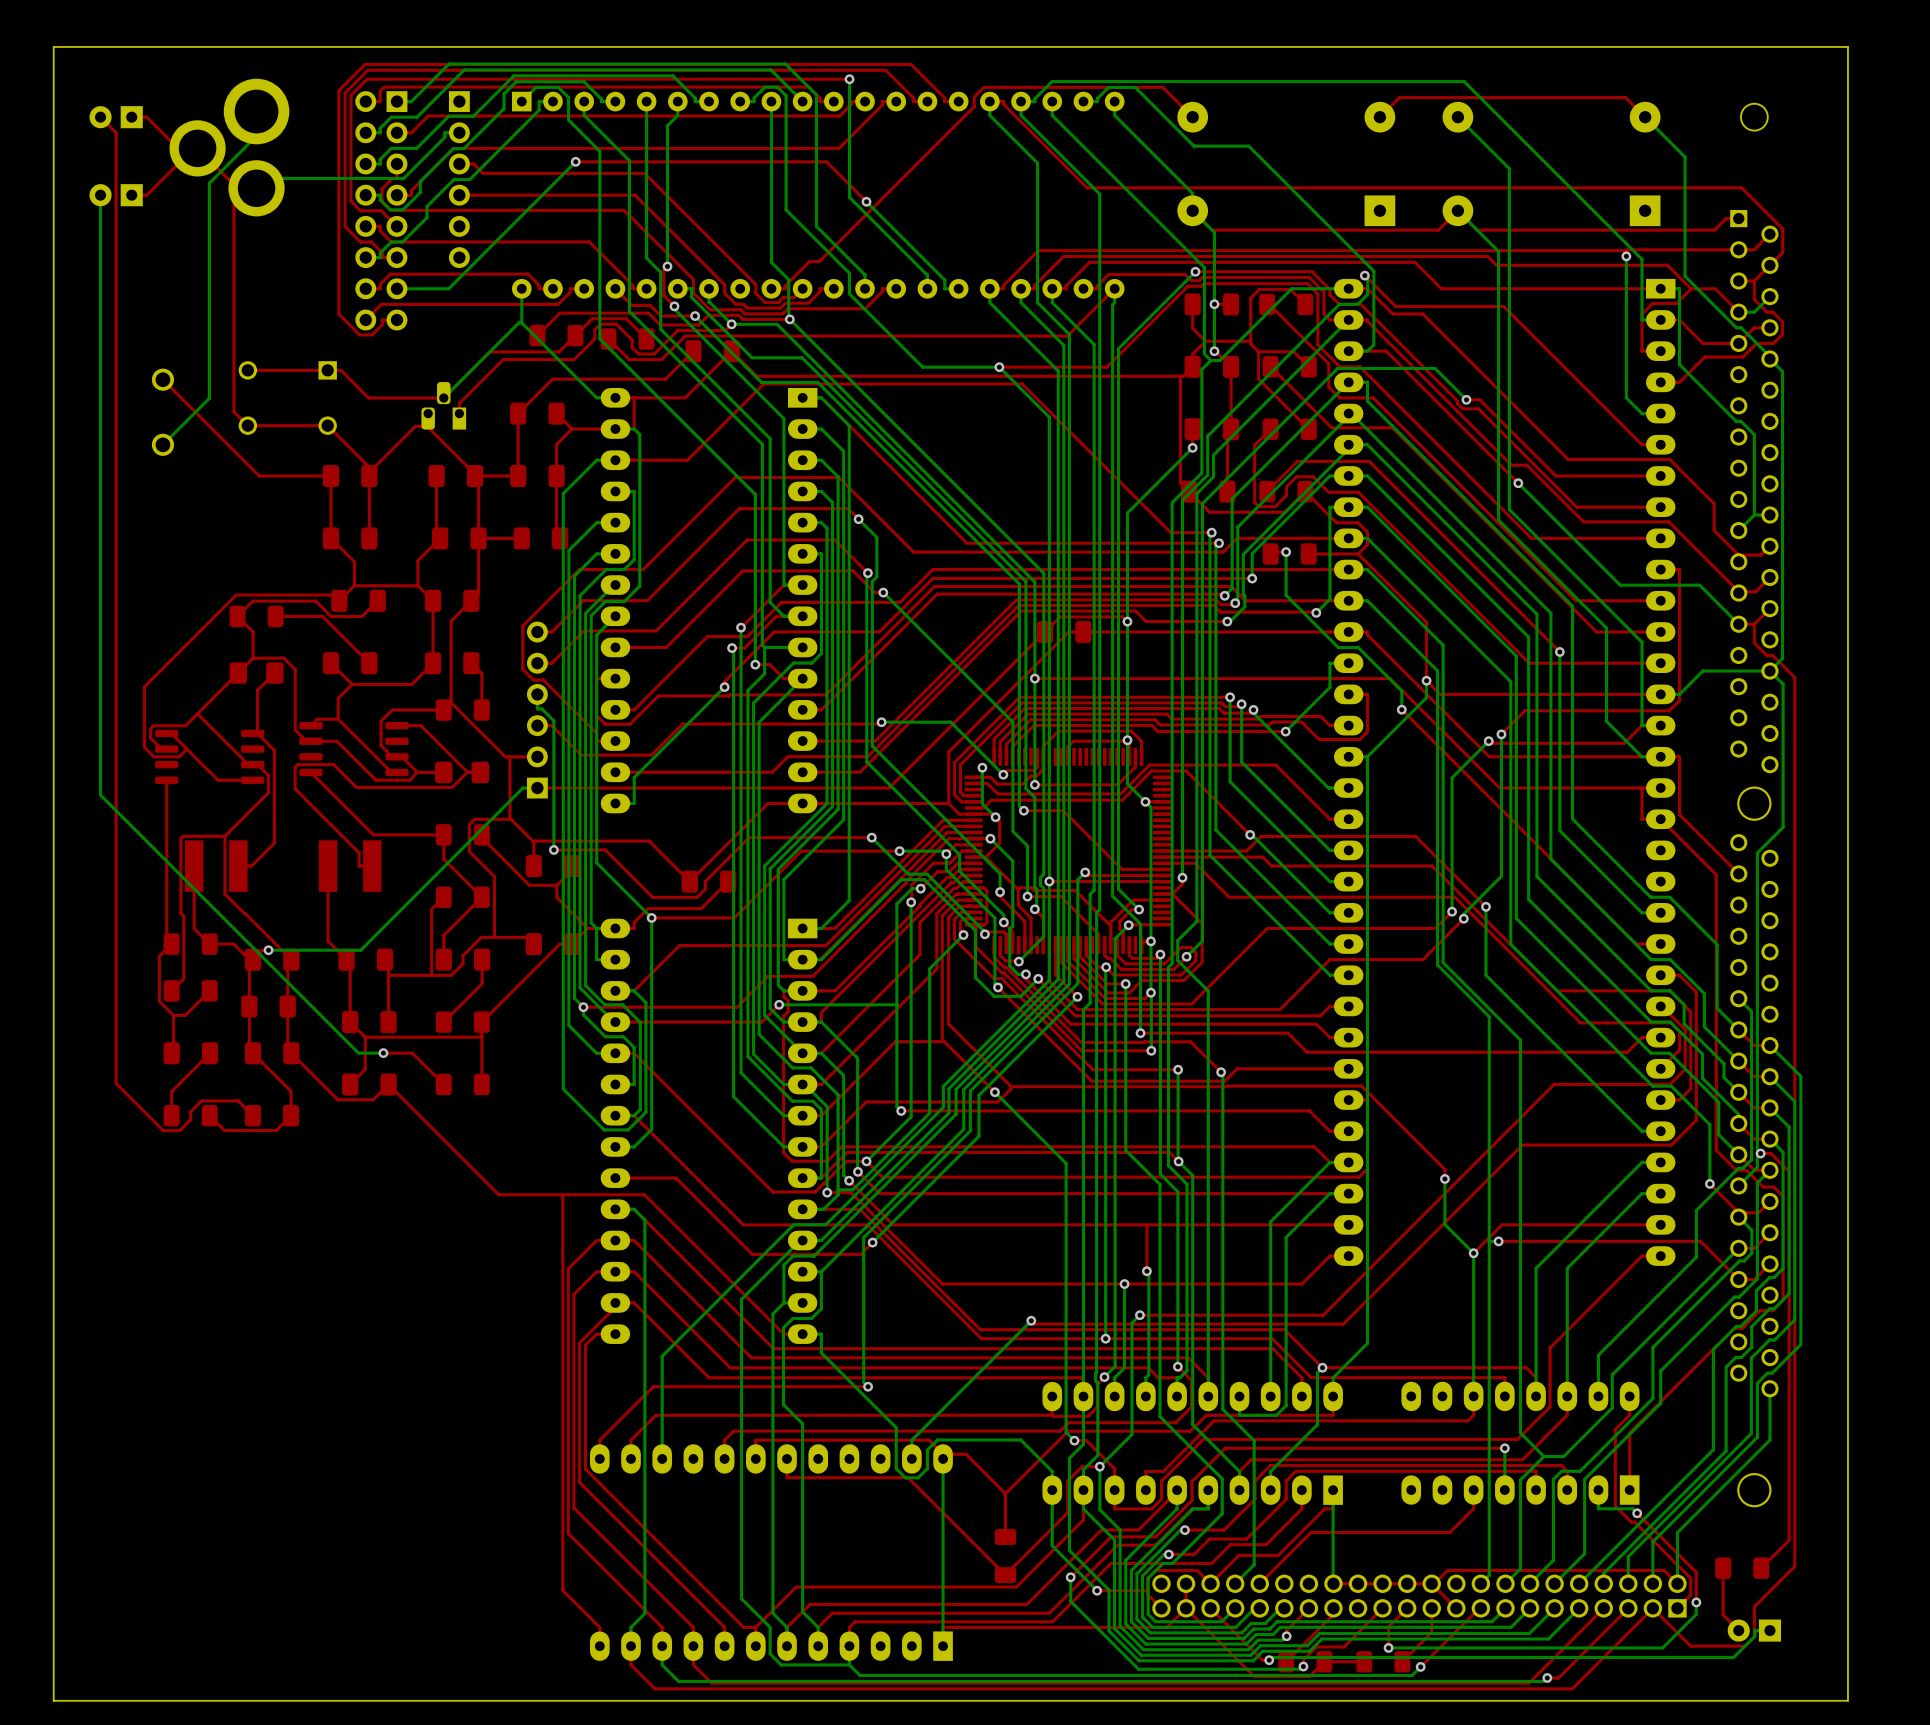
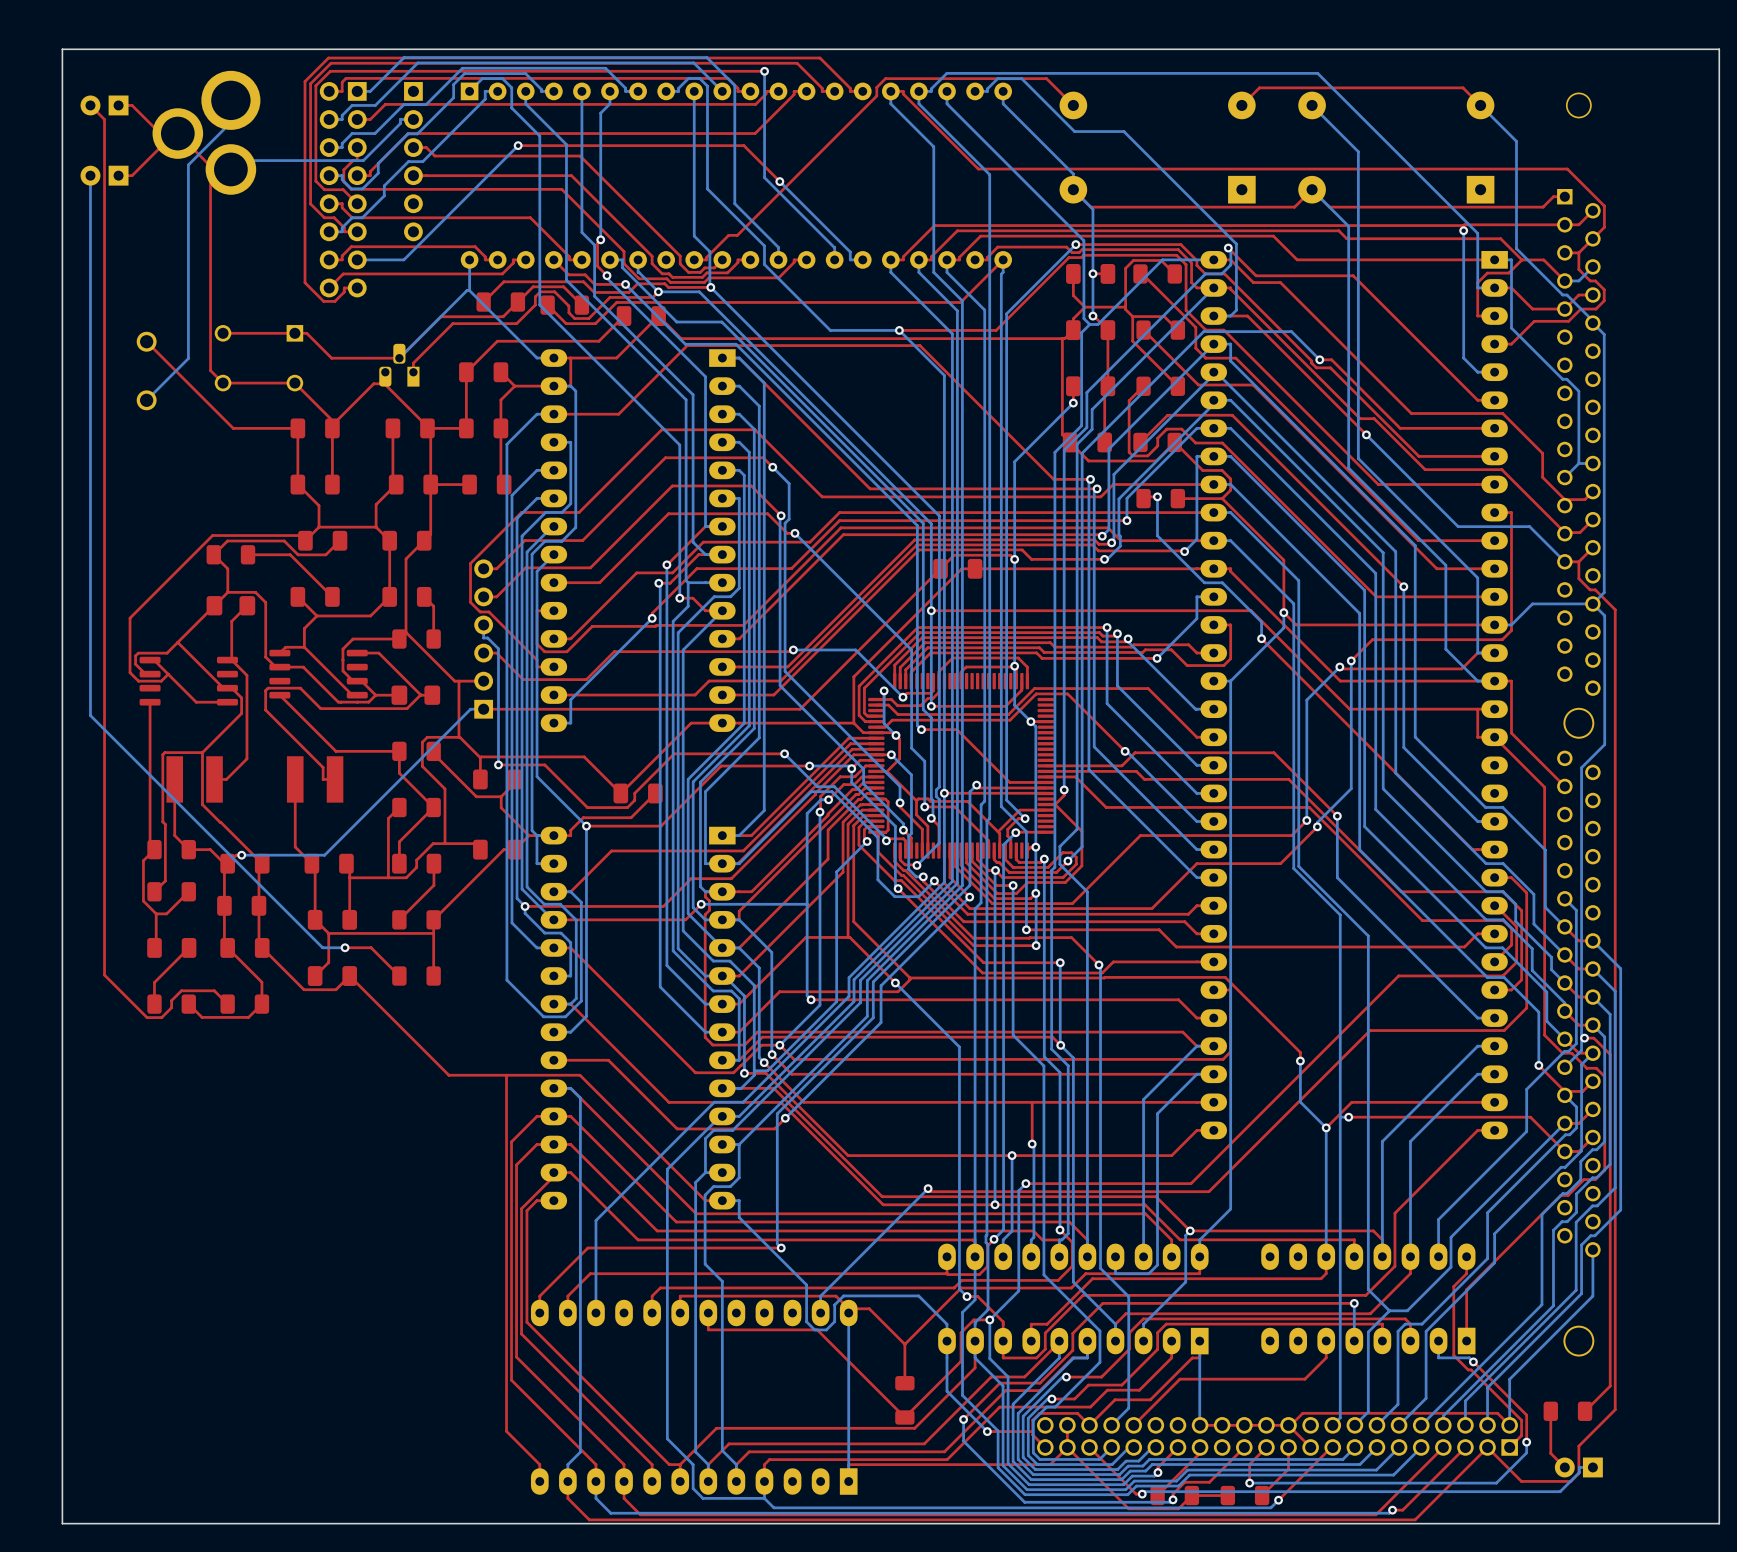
board edge: (1847, 46) (53, 46) (53, 1700) (1847, 1700) (1847, 46) -> (1719, 49) (1719, 1523) (62, 1523) (62, 49) (1719, 49)

